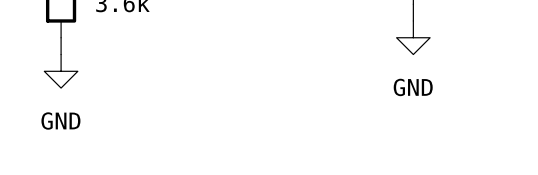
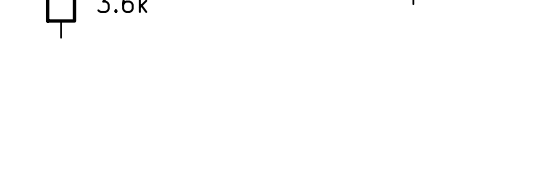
wire: (413, 4) (413, 20) -> none
wire: (61, 37) (61, 54) -> none
power symbol: GND (413, 37) -> none
power symbol: GND (61, 71) -> none

